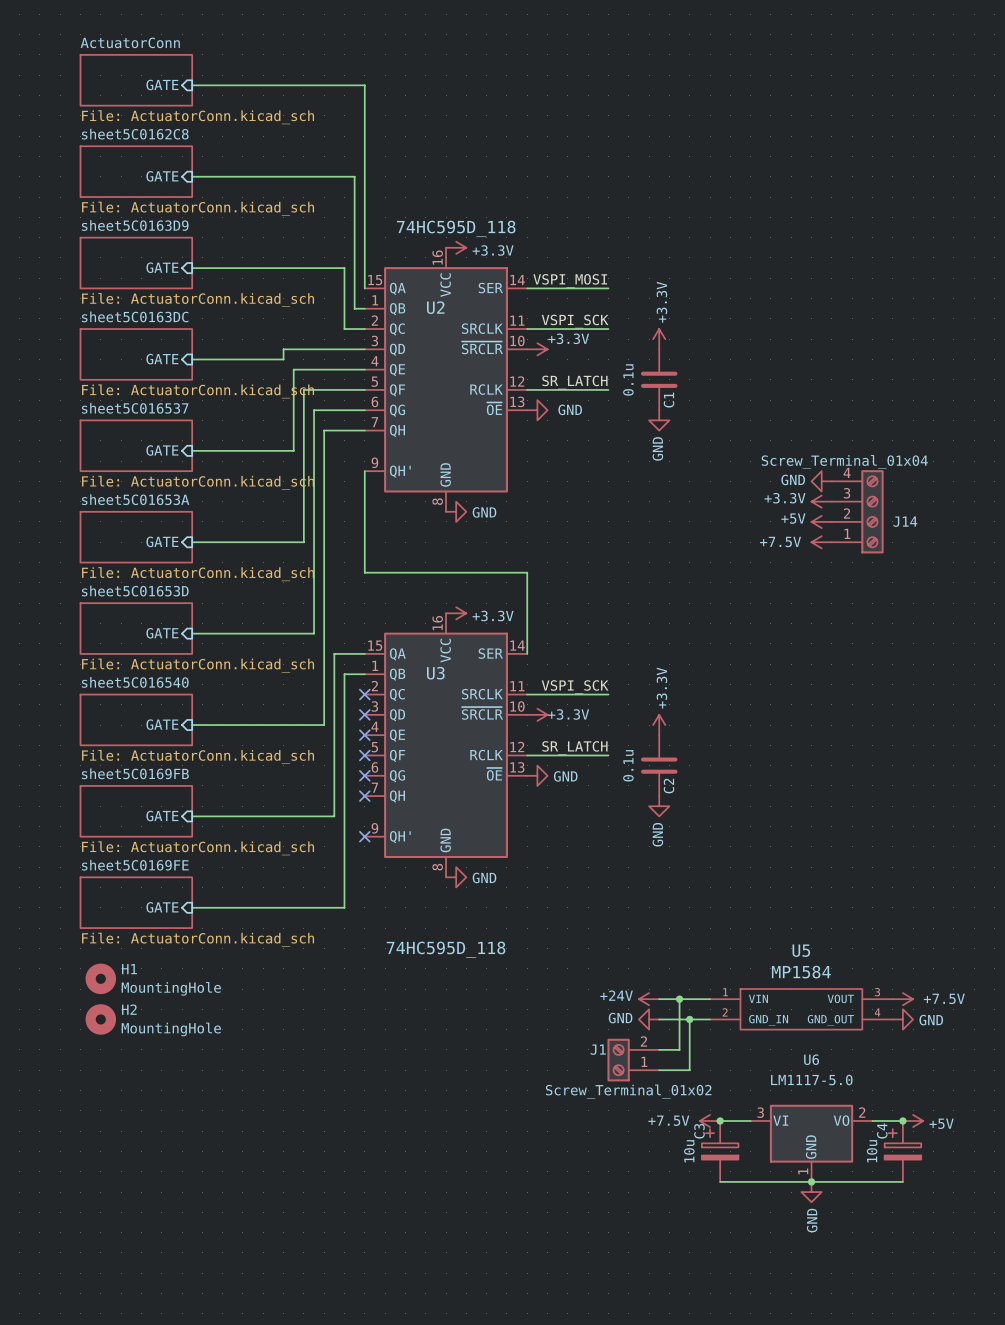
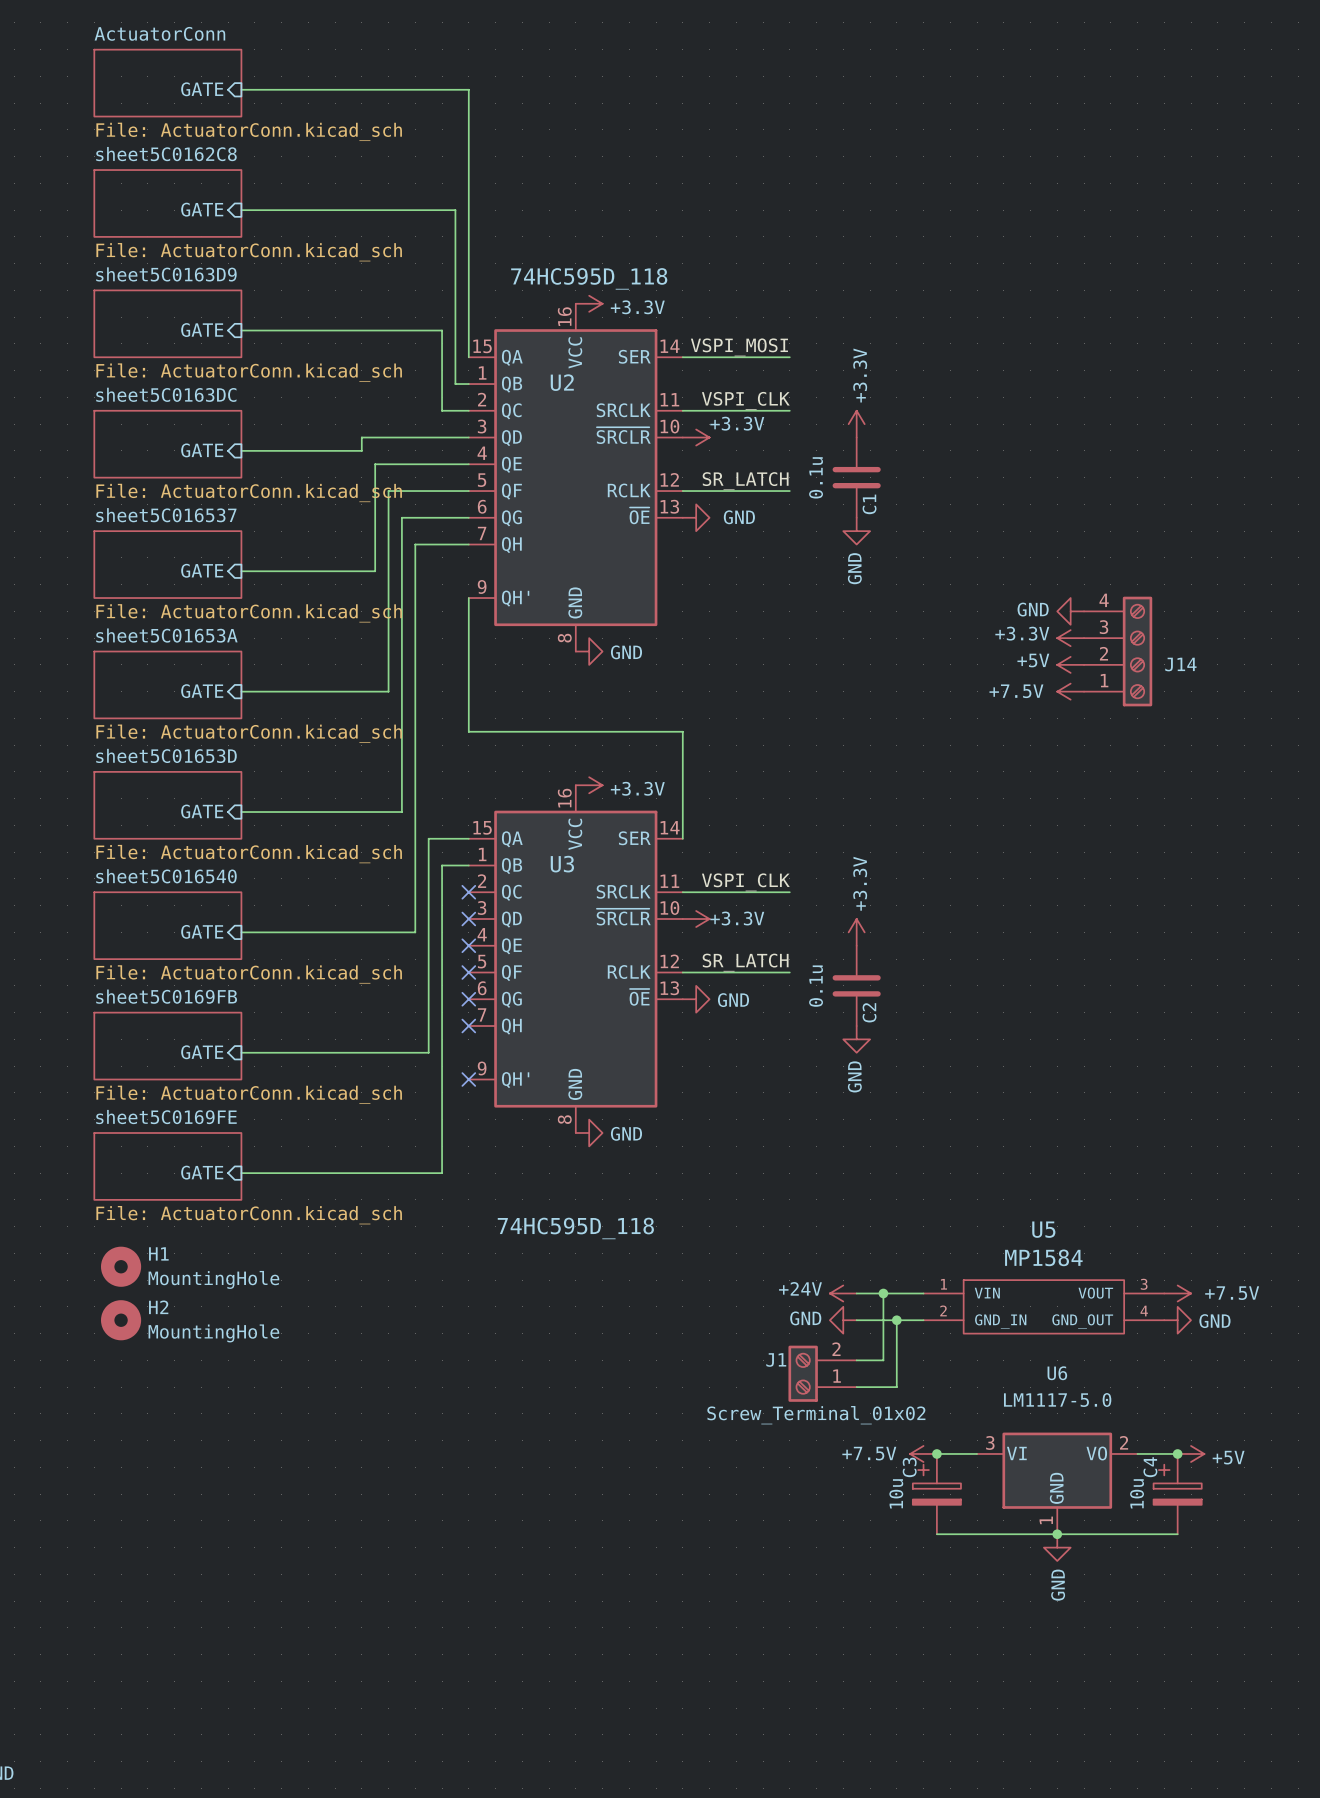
label: VSPI_SCK (575, 321) -> VSPI_CLK (745, 400)
J14 value: Screw_Terminal_01x04 (844, 462) -> none
label: VSPI_SCK (575, 687) -> VSPI_CLK (745, 882)

